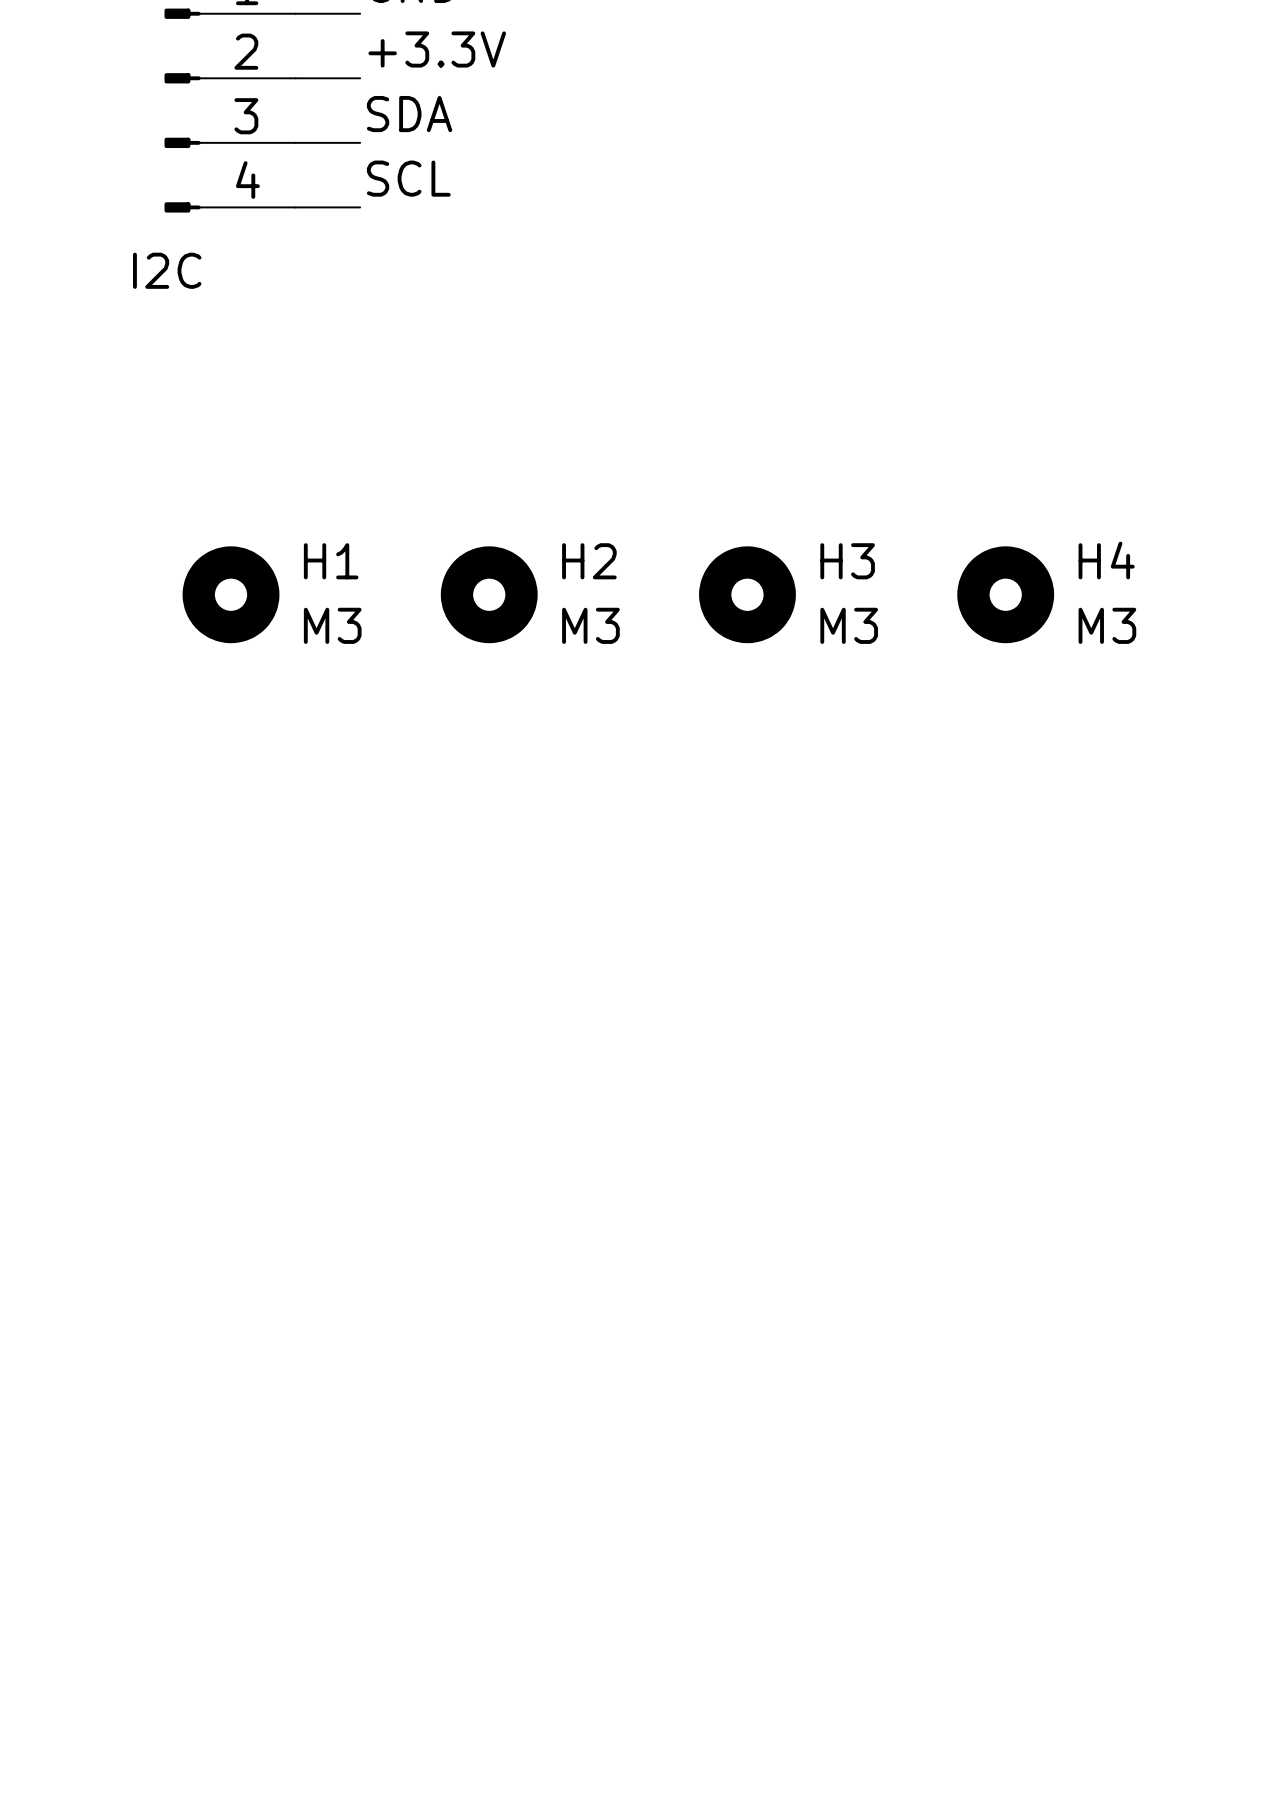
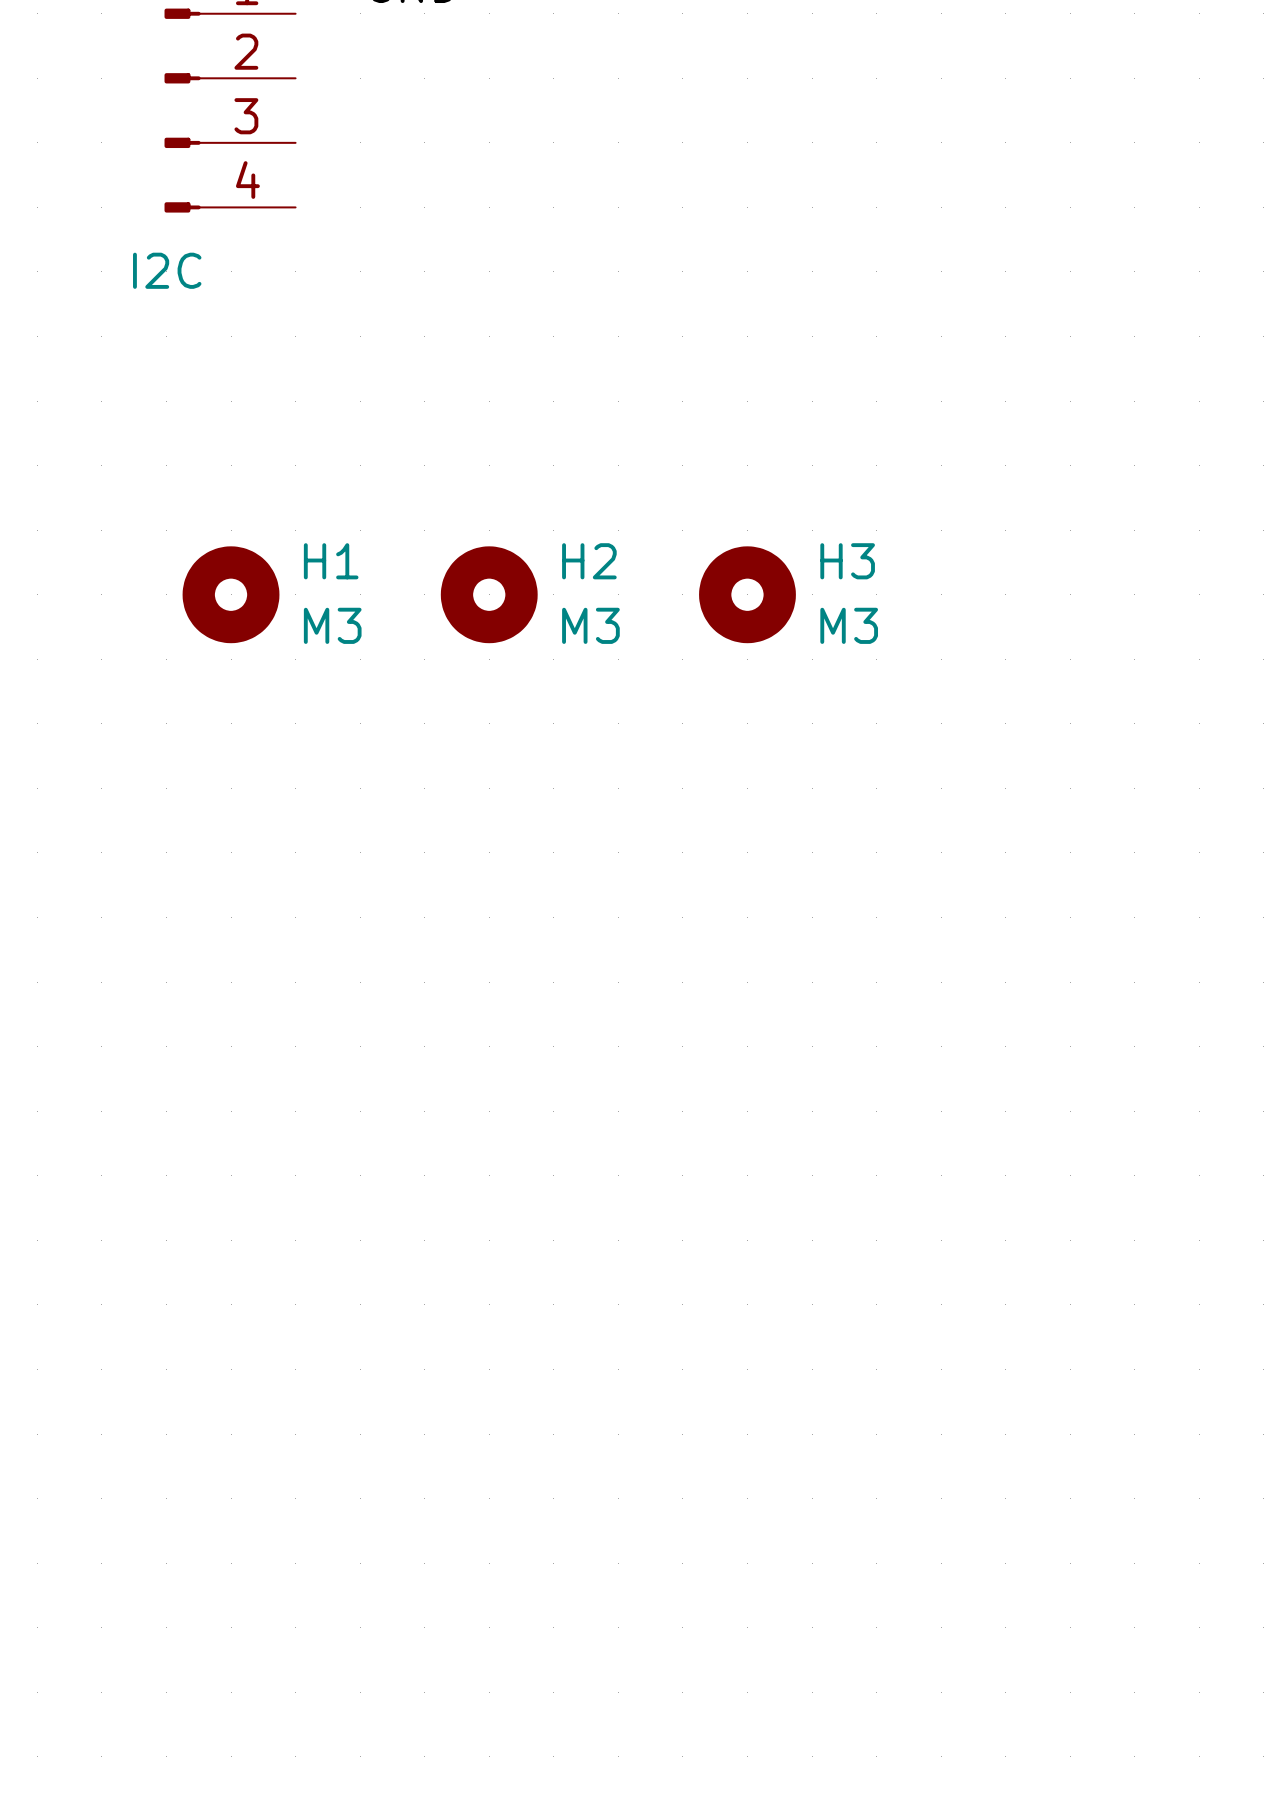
wire: (295, 13) (360, 13) -> none
label: +3.3V (437, 49) -> none
wire: (295, 78) (360, 78) -> none
label: SDA (409, 114) -> none
wire: (295, 142) (360, 142) -> none
label: SCL (408, 178) -> none
wire: (295, 207) (360, 207) -> none
H4: M3 (1005, 594) -> none

